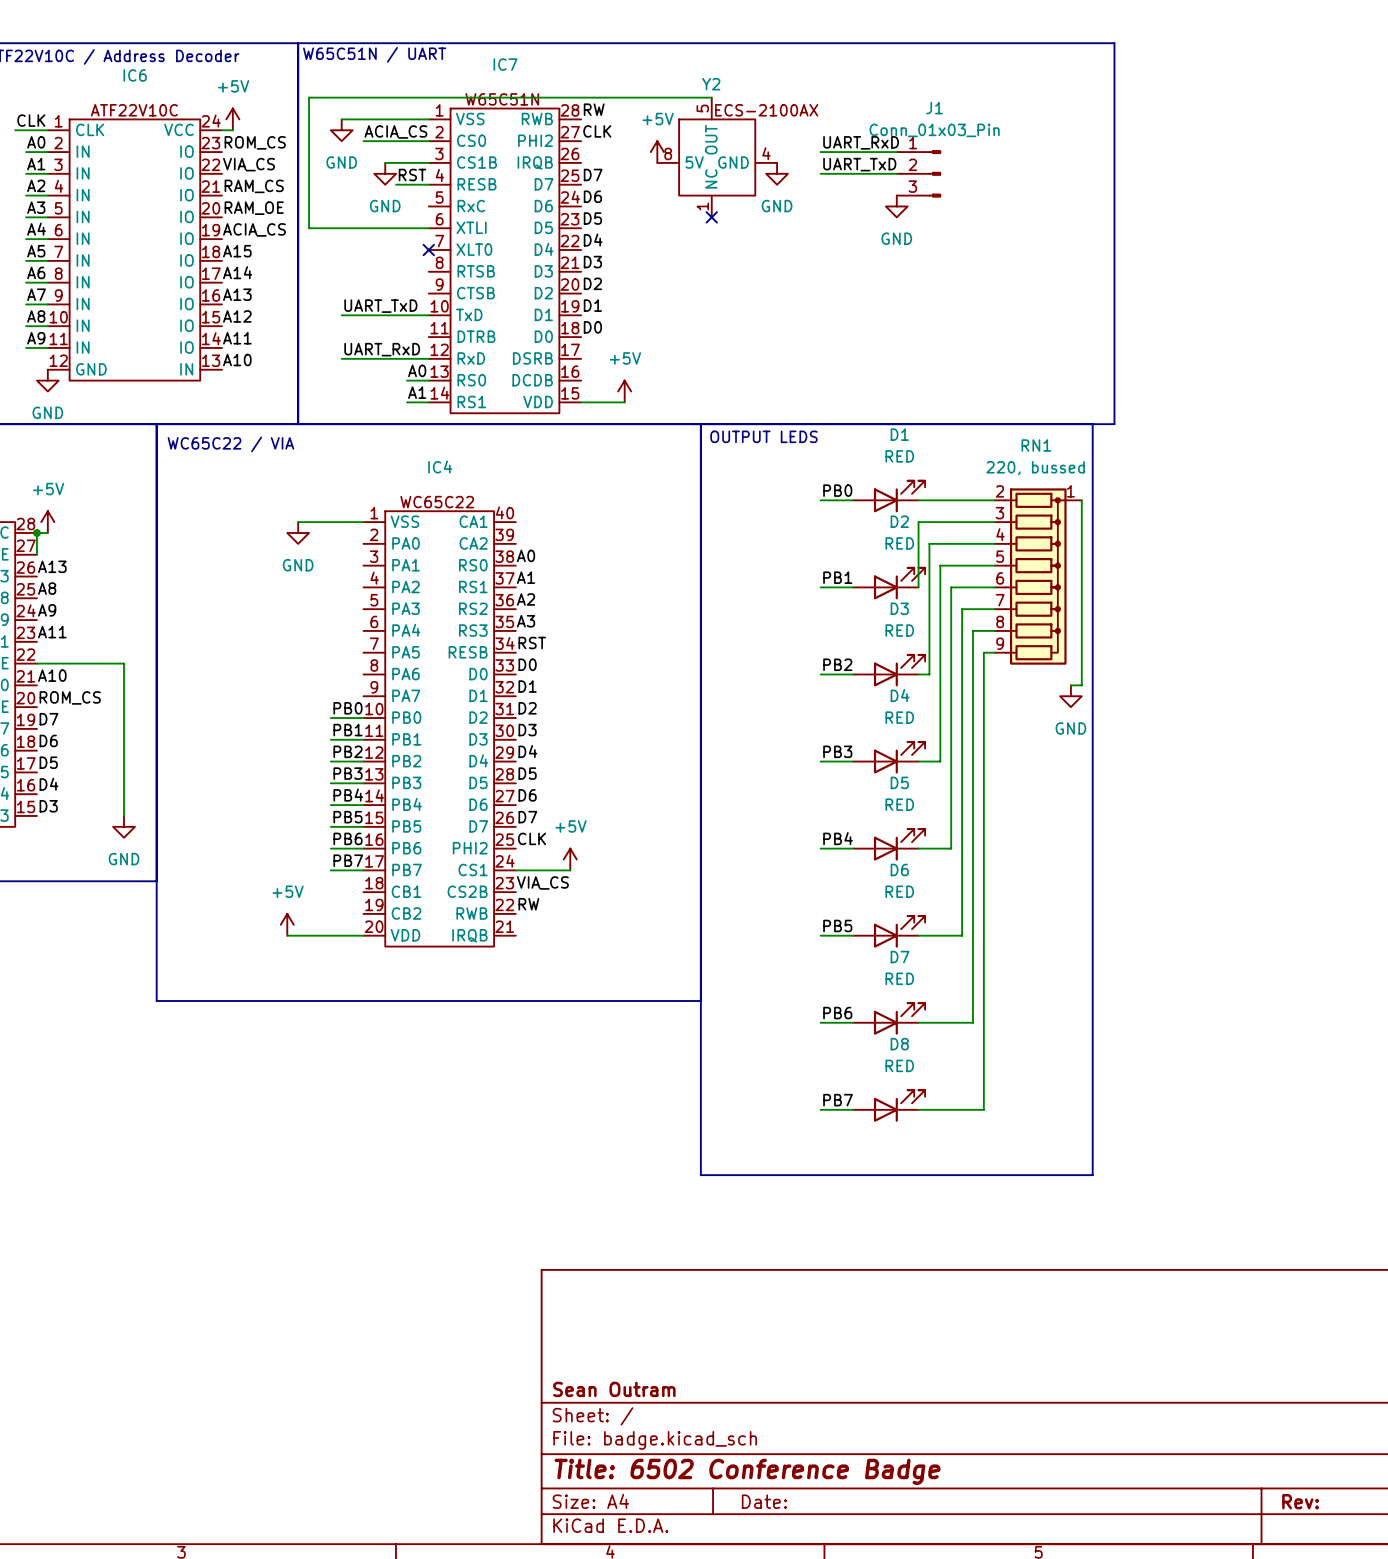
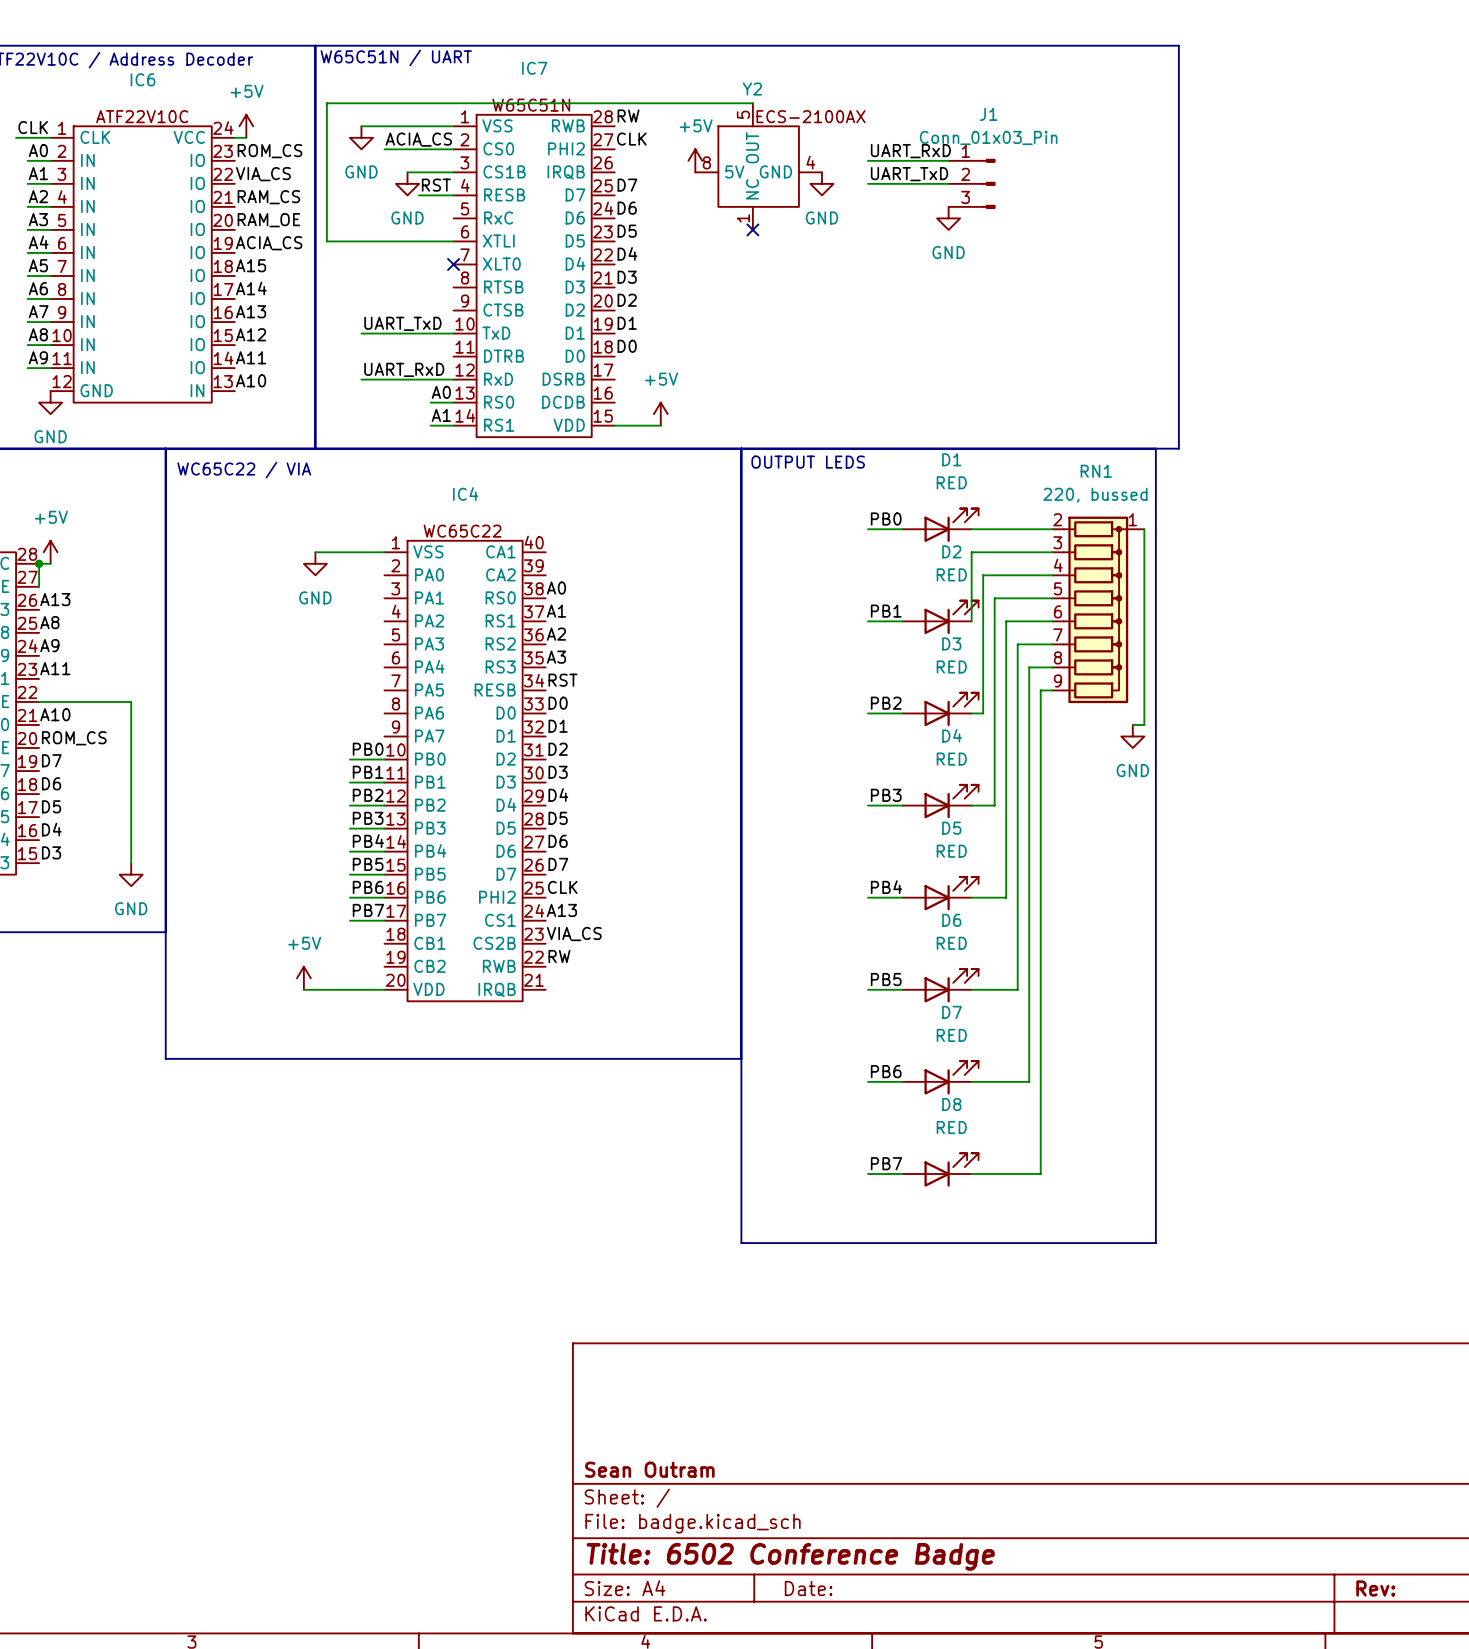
power symbol: +5V (570, 859) -> none
label: none -> A13 (561, 910)
wire: (515, 870) (570, 870) -> none

